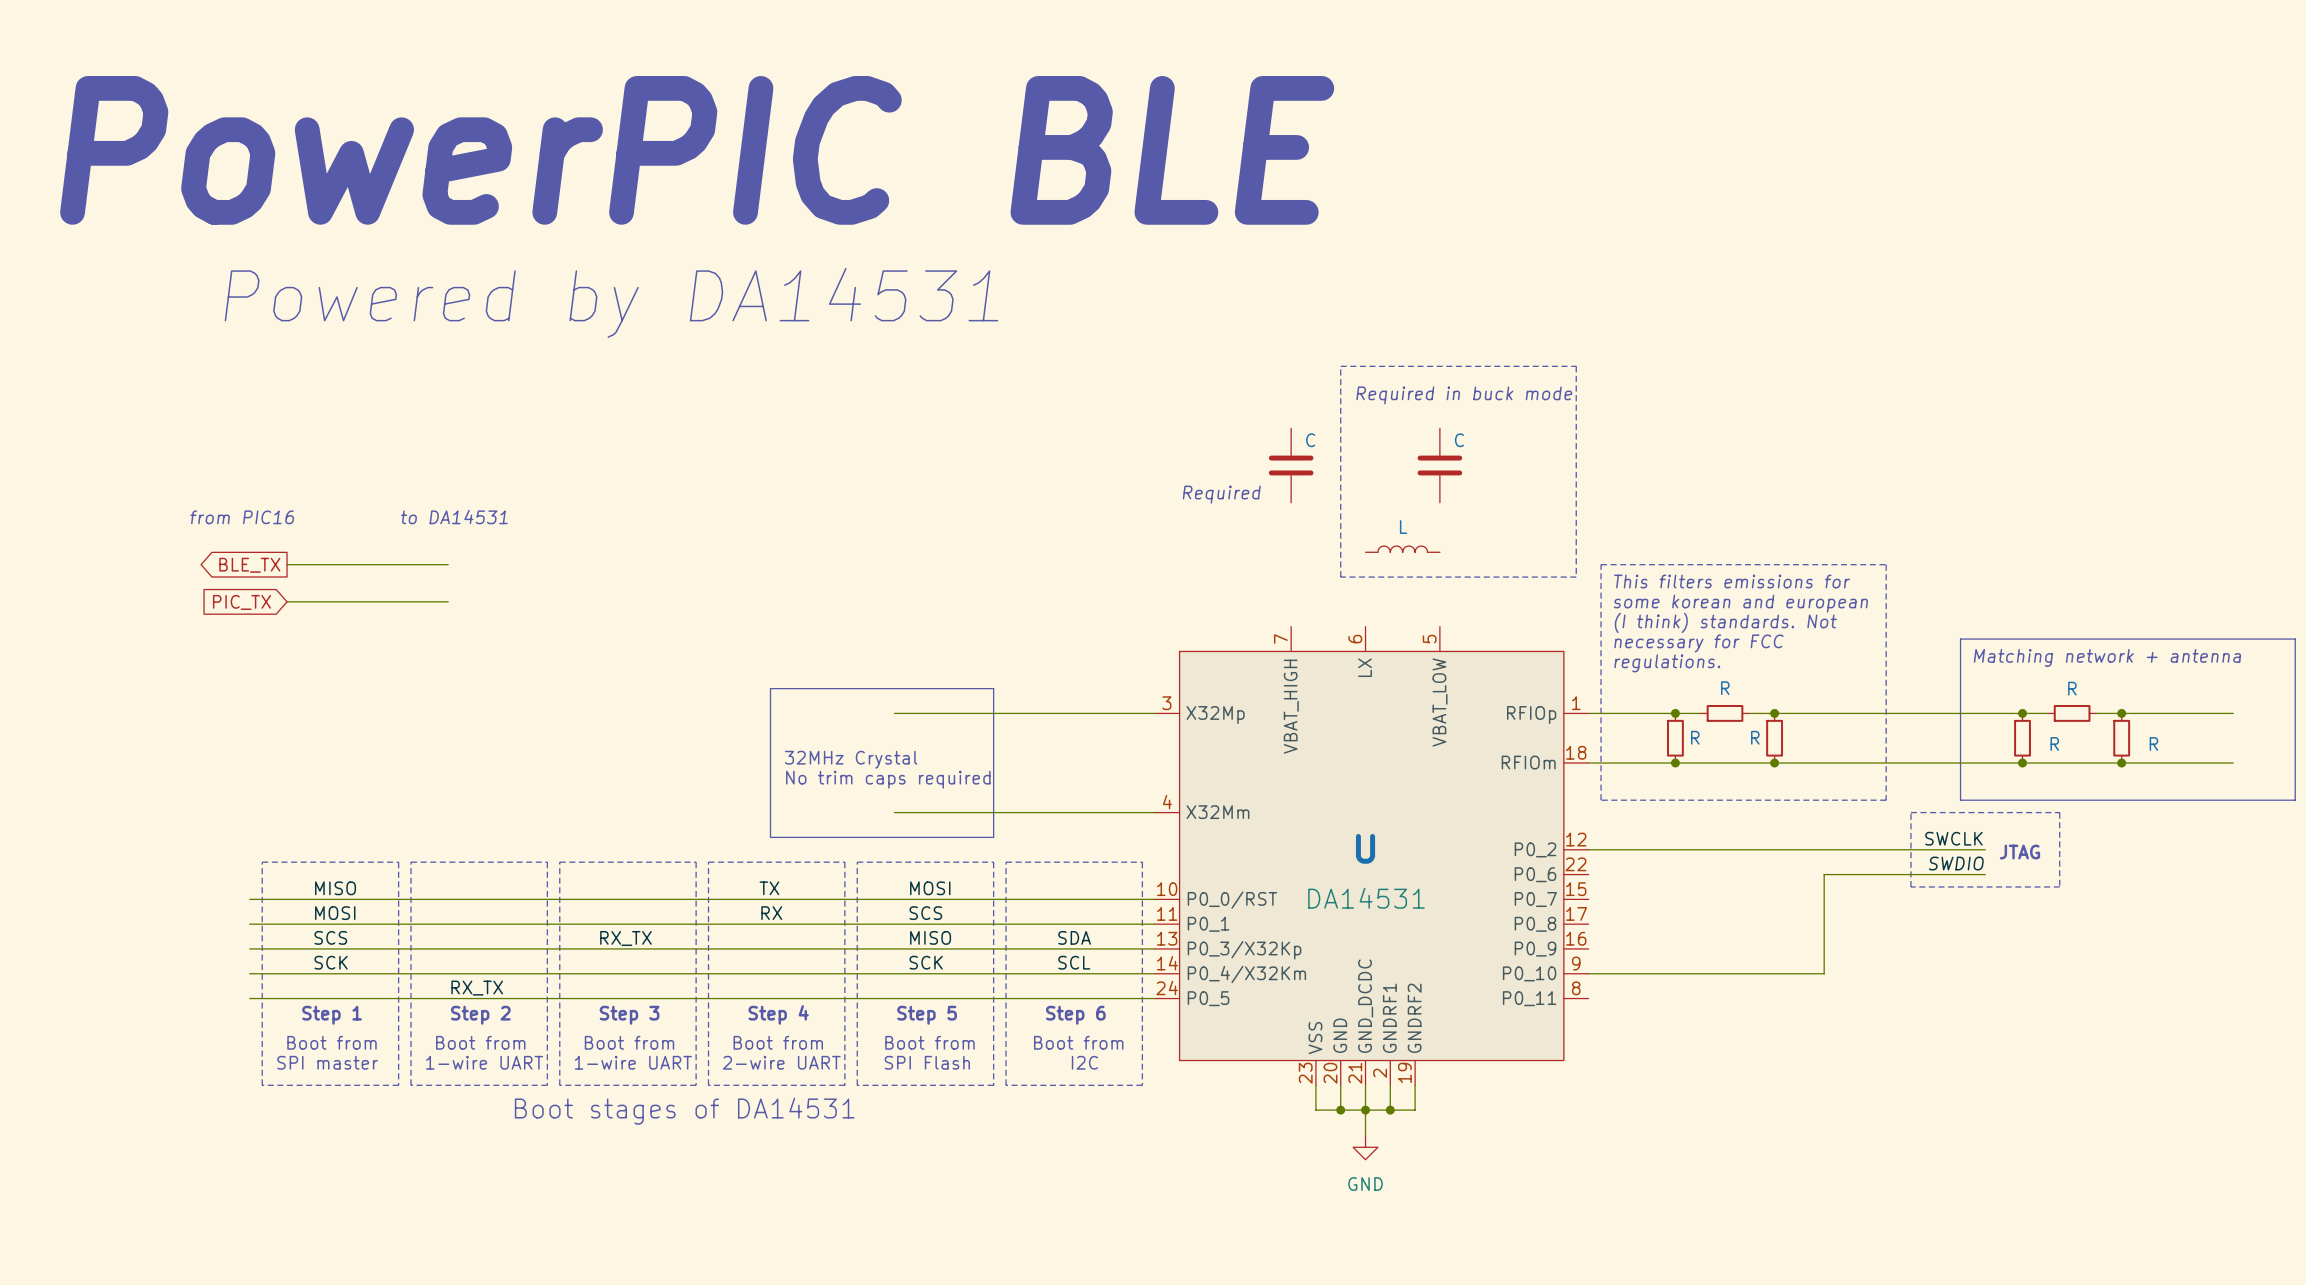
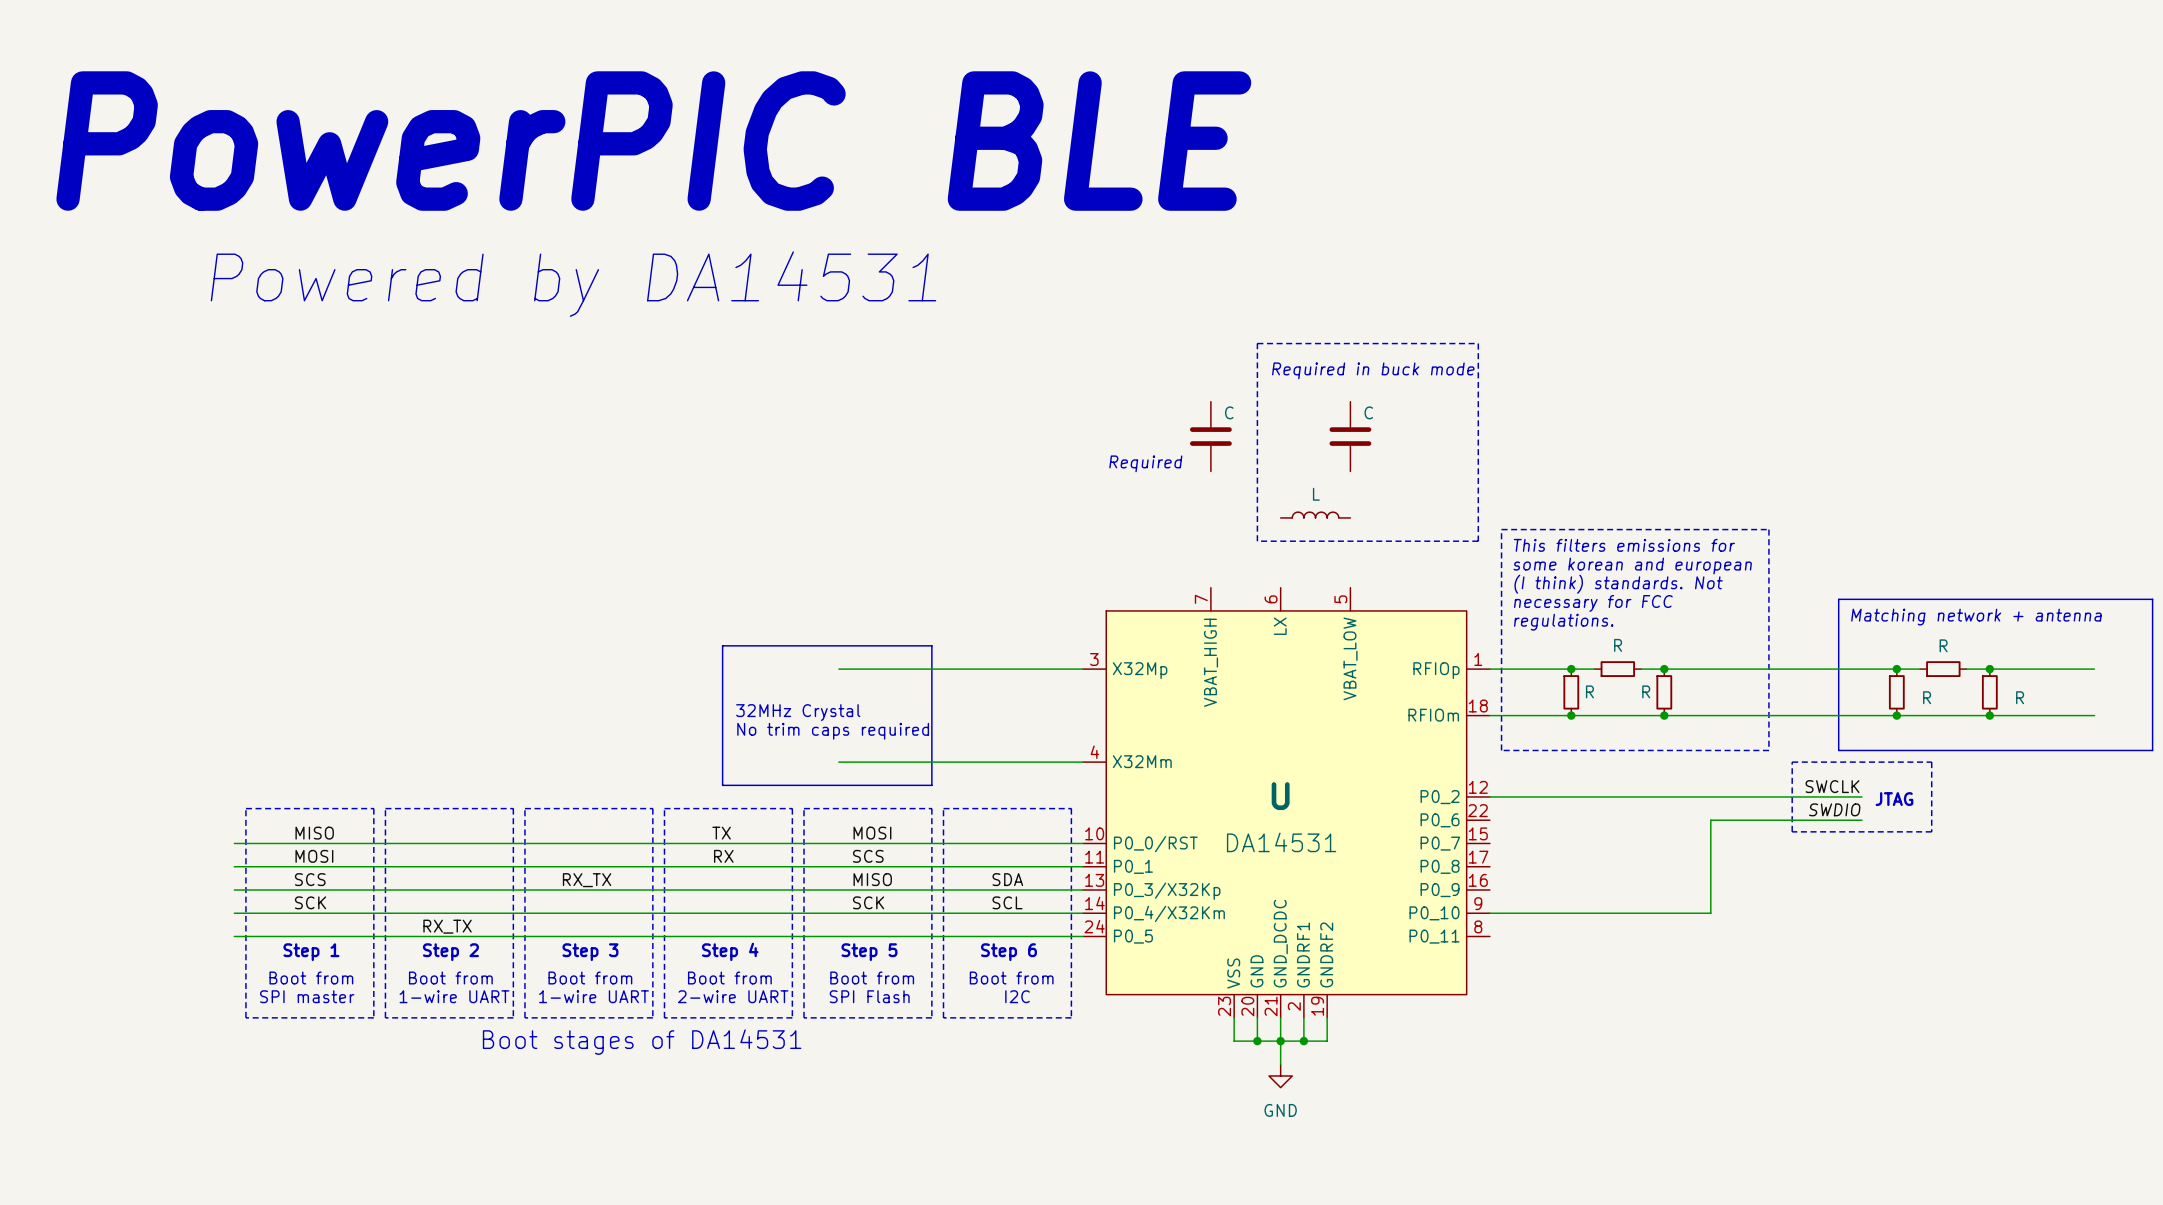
text: from PIC16 (242, 517) -> none
text: to DA14531 (454, 517) -> none
wire: (287, 564) (448, 564) -> none
global label: BLE_TX (249, 565) -> none
wire: (287, 601) (448, 601) -> none
global label: PIC_TX (242, 602) -> none

